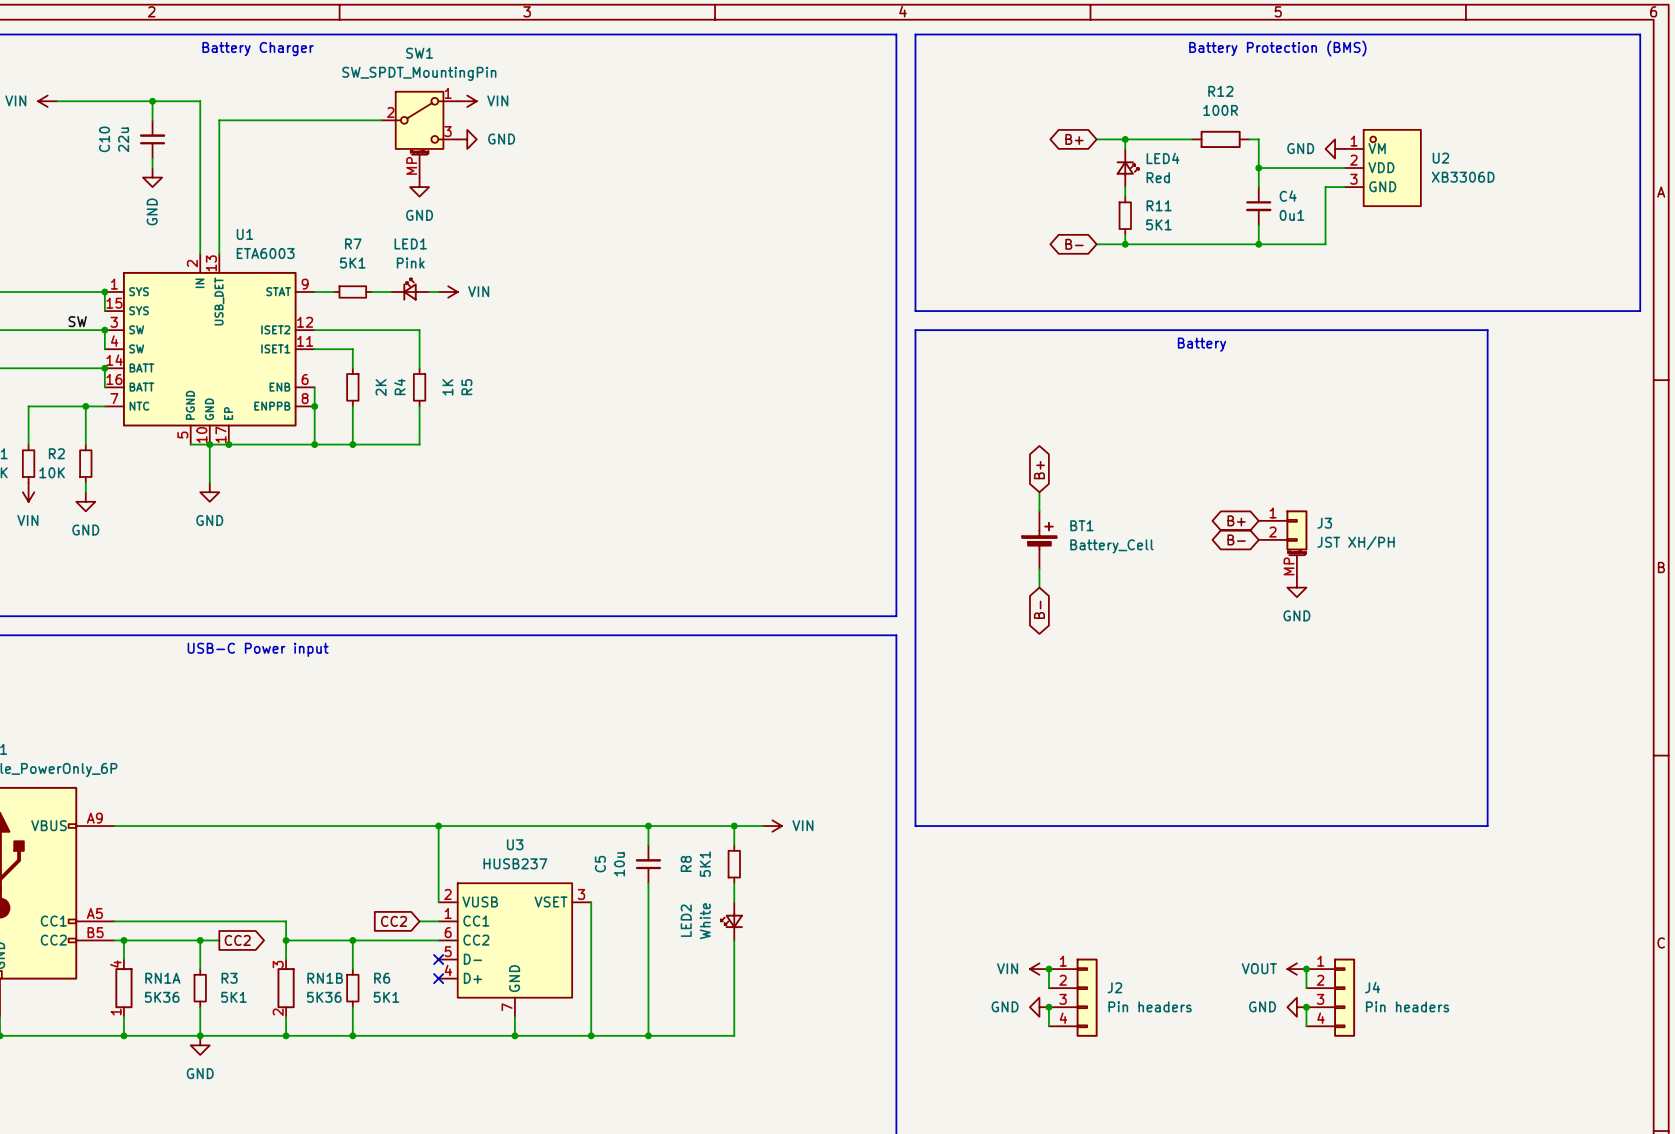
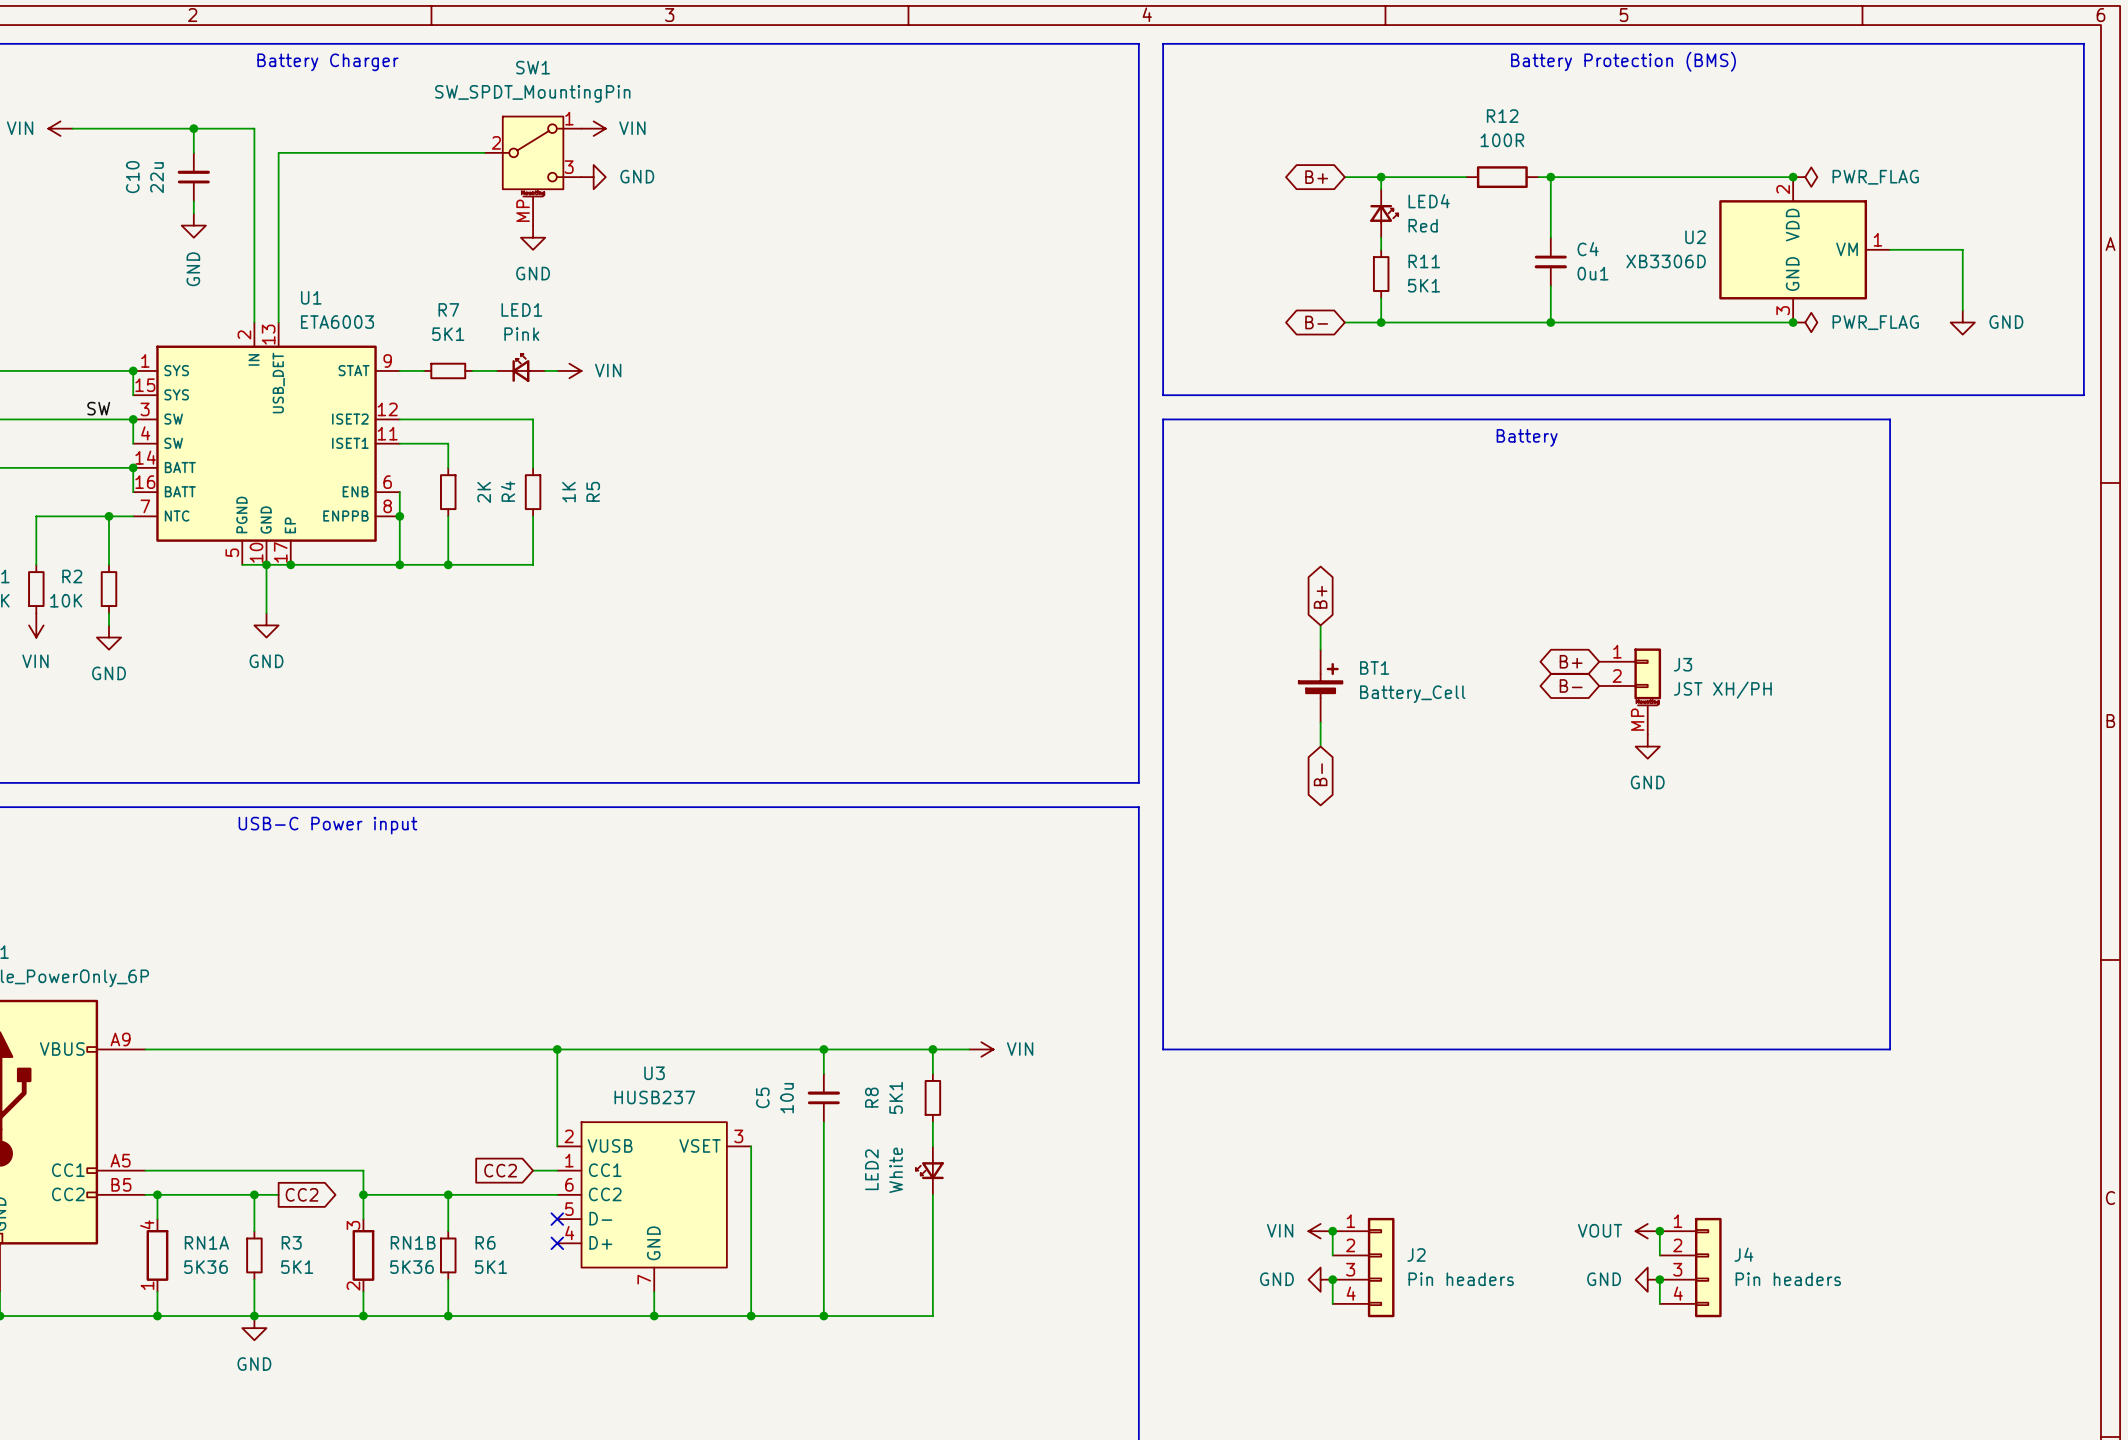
U2 symbol: [1344, 129, 1421, 207] -> [1719, 177, 1891, 323]
wire: none -> (1344, 177) (1393, 177)
global label position: B+ (1074, 139) -> B+ (1316, 177)
wire: (1125, 139) (1125, 148) -> (1381, 177) (1381, 189)
junction position: (1125, 139) -> (1381, 177)
wire: (1153, 139) (1192, 139) -> (1538, 177) (1587, 177)
wire: none -> (1550, 177) (1550, 237)
junction: none -> (1550, 177)
R12 position: (1220, 139) -> (1502, 177)
wire: (1258, 139) (1258, 187) -> (1599, 177) (1793, 177)
junction: none -> (1793, 177)
power symbol: none -> PWR_FLAG (1805, 177)
power symbol: GND (1335, 148) -> none
U2 name position: U2 (1440, 158) -> U2 (1695, 237)
LED4 position: (1127, 168) -> (1384, 213)
wire: (1258, 168) (1344, 168) -> none
junction: (1258, 168) -> none
U2 value position: XB3306D (1463, 177) -> XB3306D (1666, 261)
wire: (1125, 187) (1125, 196) -> (1381, 237) (1381, 249)
wire: (1344, 187) (1325, 187) (1325, 244) (1096, 244) -> none
wire: none -> (1890, 249) (1962, 249) (1962, 310)
C4 position: (1258, 206) -> (1550, 261)
R11 position: (1125, 215) -> (1381, 274)
wire: none -> (1550, 286) (1550, 322)
wire: (1258, 225) (1258, 244) -> (1381, 298) (1381, 322)
wire: (1125, 234) (1125, 244) -> none
global label position: B- (1074, 244) -> B- (1316, 322)
junction position: (1125, 244) -> (1381, 322)
junction position: (1258, 244) -> (1550, 322)
wire: none -> (1344, 322) (1793, 322)
junction: none -> (1793, 322)
power symbol: none -> PWR_FLAG (1805, 322)
power symbol: none -> GND (1962, 322)

